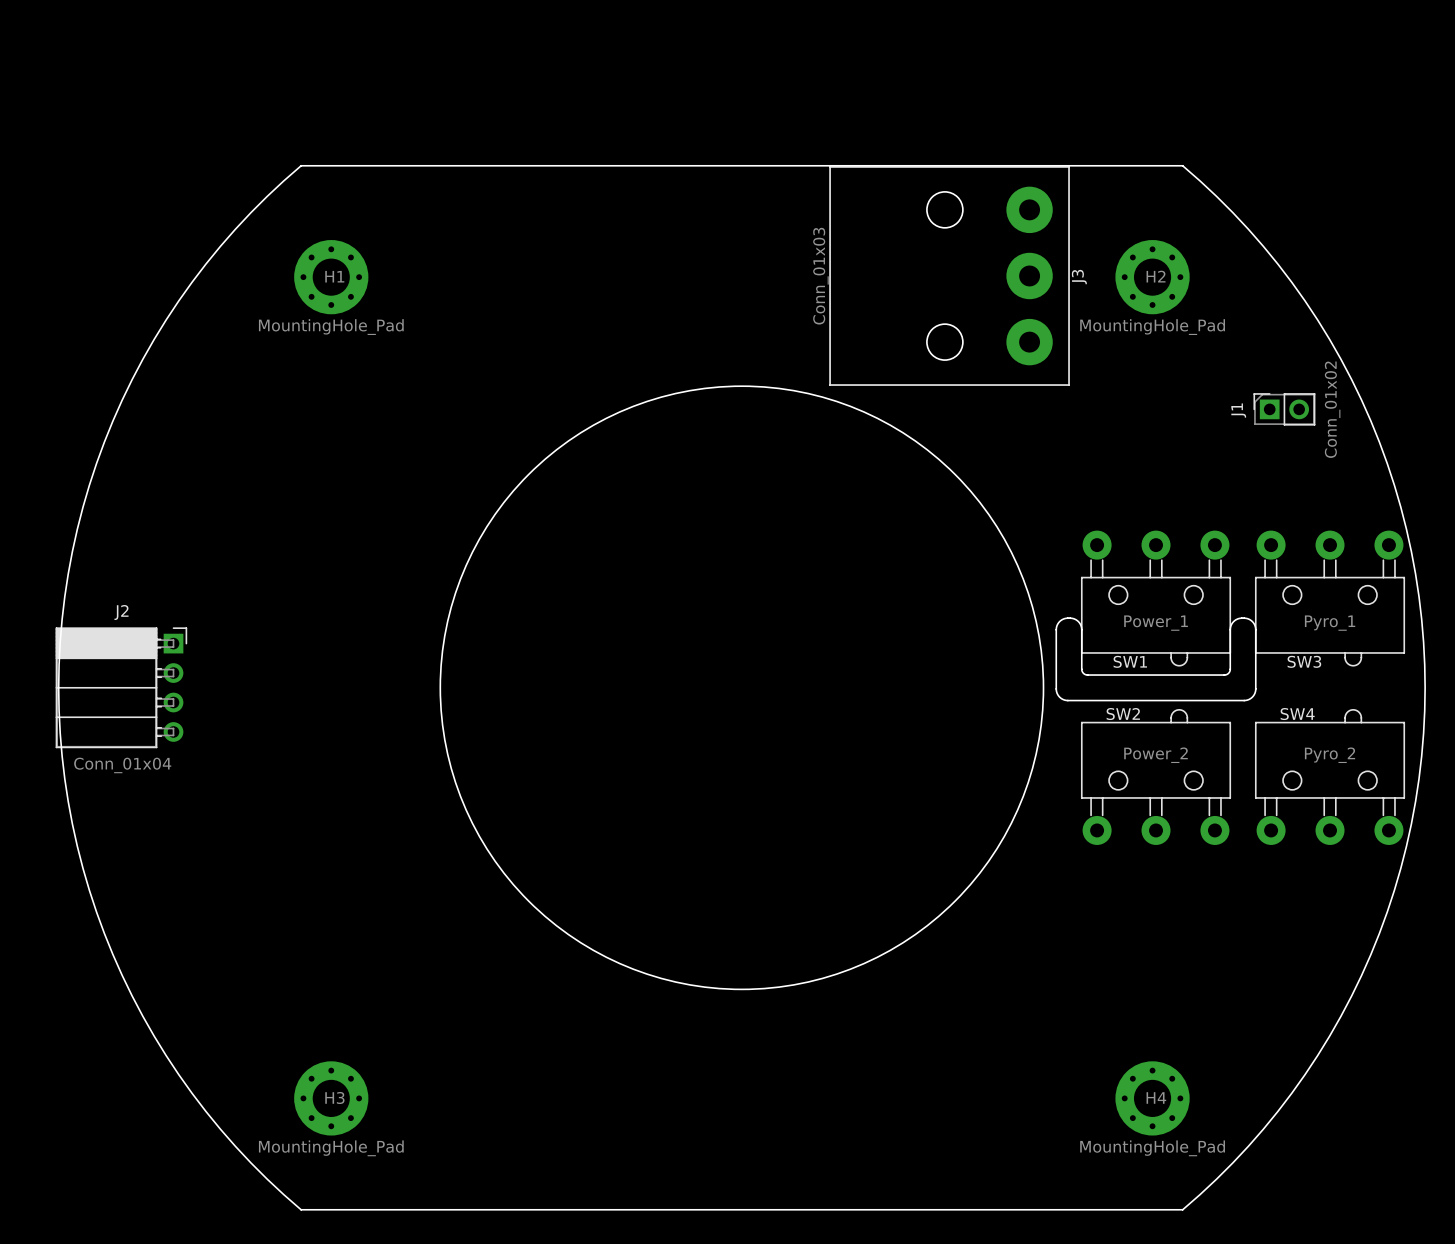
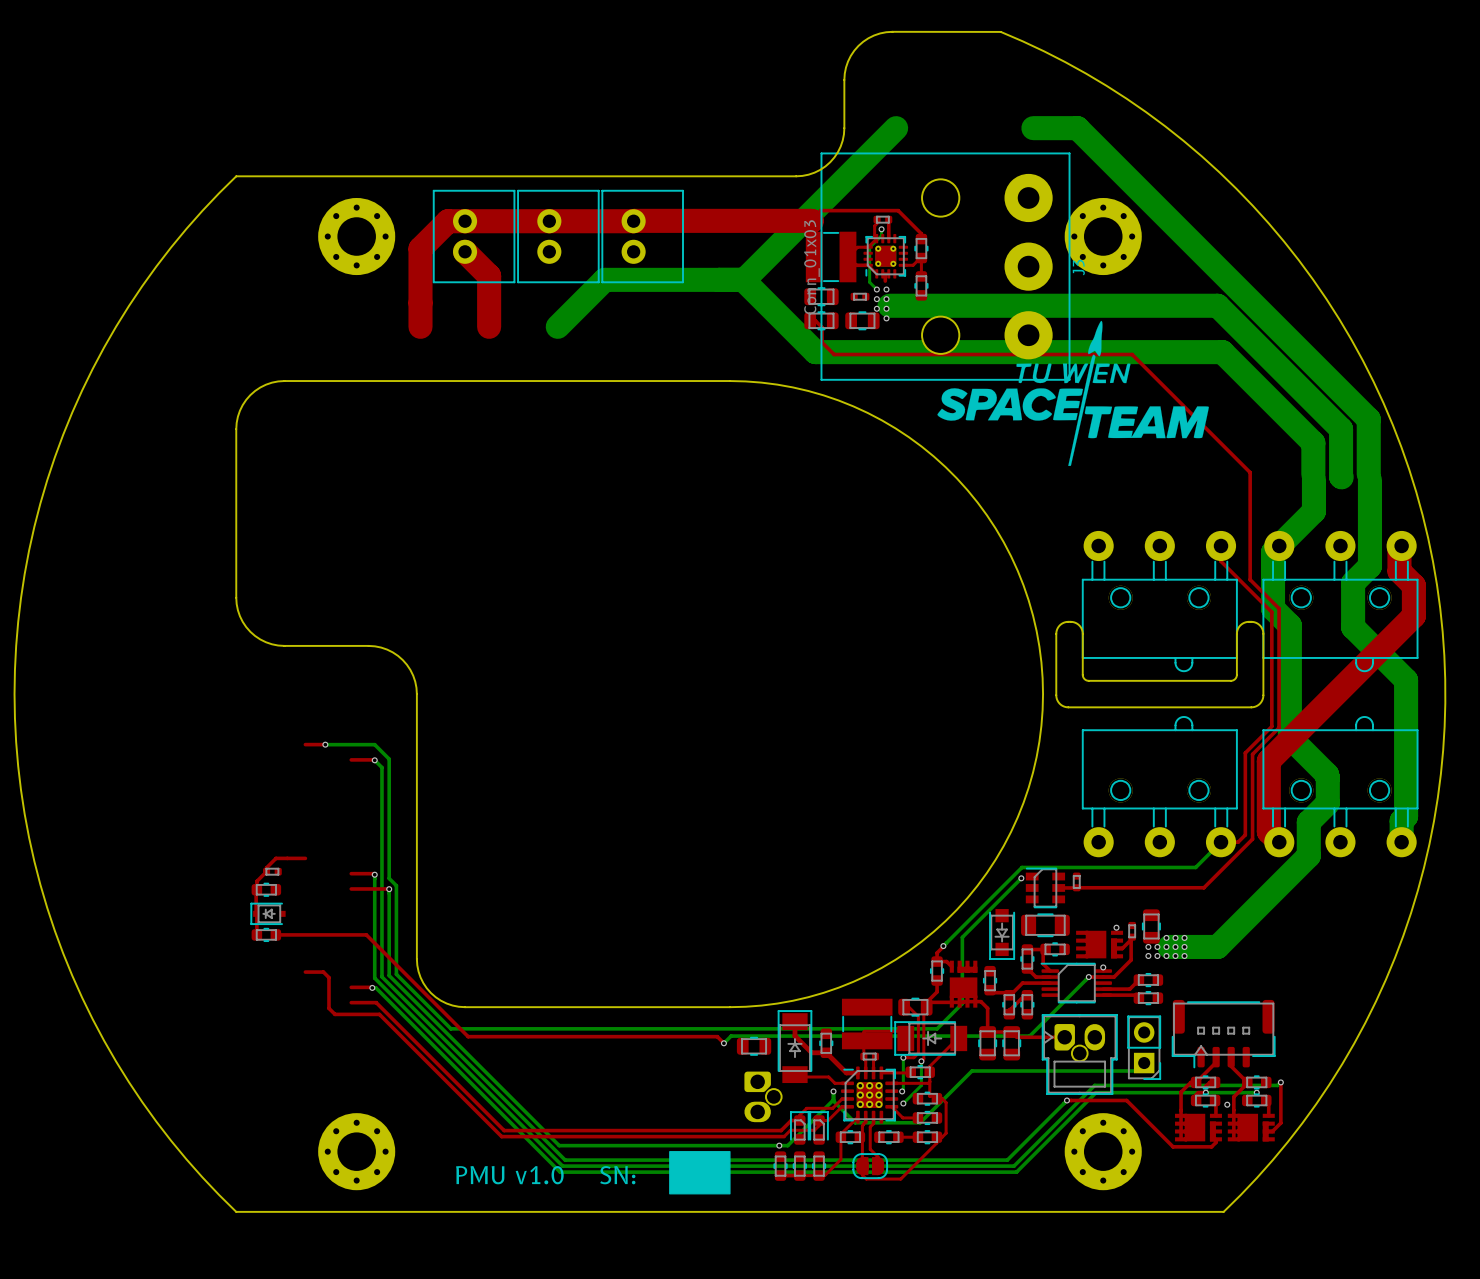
bottom track: none -> (896, 128) (744, 279) (604, 279) (557, 326)
bottom track: none -> (1033, 128) (1077, 128) (1368, 419) (1368, 474)
board edge: (301, 165) (1182, 165) (1232, 212) (1263, 246) (1305, 300) (1340, 359) (1370, 420) (1394, 485) (1406, 529) (1419, 596) (1424, 664) (1423, 733) (1415, 801) (1400, 868) (1379, 933) (1351, 996) (1317, 1055) (1277, 1111) (1232, 1163) (1182, 1209) (301, 1209) (251, 1163) (220, 1129) (178, 1074) (142, 1016) (112, 954) (89, 890) (72, 823) (62, 756) (58, 687) (60, 642) (68, 574) (83, 507) (104, 442) (132, 379) (166, 319) (205, 264) (251, 212) (301, 165) -> (892, 31) (880, 33) (868, 38) (858, 45) (850, 55) (844, 73) (844, 128) (840, 146) (834, 157) (825, 166) (808, 174) (796, 176) (236, 176) (202, 210) (171, 247) (142, 286) (104, 347) (82, 390) (54, 457) (34, 526) (24, 574) (18, 621) (14, 694) (16, 742) (24, 814) (34, 861) (54, 930) (72, 975) (104, 1040) (128, 1082) (171, 1140) (202, 1177) (236, 1211) (1223, 1211) (1272, 1160) (1302, 1123) (1329, 1084) (1354, 1043) (1376, 1001) (1394, 957) (1417, 890) (1434, 821) (1440, 774) (1444, 726) (1444, 655) (1440, 608) (1432, 561) (1422, 515) (1409, 469) (1383, 403) (1362, 360) (1339, 319) (1312, 279) (1284, 241) (1252, 205) (1219, 172) (1165, 126) (1126, 98) (1086, 73) (1044, 51) (1000, 31) (892, 31)
top track: none -> (877, 219) (874, 225) (874, 236) (876, 238) (868, 247) (857, 247) (847, 256) (856, 265) (868, 265) (876, 273)
part: none -> (882, 219)
top track: none -> (888, 219) (888, 238)
top track: none -> (811, 221) (448, 221) (420, 248) (420, 326)
bottom track: none -> (881, 229) (881, 235) (869, 247) (869, 282) (876, 289)
via: none -> (881, 229)
part: none -> (356, 236)
part: none -> (474, 236)
part: none -> (558, 236)
part: none -> (642, 236)
part: none -> (1103, 236)
top track: none -> (921, 239) (921, 233) (898, 210) (820, 210) (814, 217) (814, 256)
part: none -> (921, 248)
top track: none -> (465, 251) (489, 275) (489, 326)
part: none -> (831, 256)
part: none -> (885, 256)
top track: none -> (903, 265) (913, 265) (921, 256) (921, 277)
H1: MountingHole_Pad (331, 277) -> none
H2: MountingHole_Pad (1152, 277) -> none
top track: none -> (888, 273) (882, 273) (885, 276) (885, 281)
bottom track: none -> (743, 279) (815, 352) (1222, 352) (1313, 443) (1313, 474)
part: none -> (921, 285)
via: none -> (876, 289)
via: none -> (886, 289)
part: none -> (821, 296)
part: none -> (860, 296)
via: none -> (876, 299)
via: none -> (886, 299)
bottom track: none -> (889, 305) (1217, 305) (1341, 429) (1341, 477)
via: none -> (876, 308)
via: none -> (886, 308)
via: none -> (886, 318)
top track: none -> (810, 320) (815, 320) (822, 327) (822, 342) (834, 354) (1132, 354) (1250, 472) (1250, 579) (1279, 608) (1279, 727) (1252, 754) (1252, 839) (1203, 887) (1058, 887)
part: none -> (821, 320)
part: none -> (862, 320)
drawing: none -> [937, 320, 1209, 466]
round board edge: [440, 385, 1044, 990] -> none
board edge: none -> (284, 381) (761, 382) (792, 387) (838, 400) (881, 420) (908, 437) (933, 456) (956, 478) (977, 502) (995, 528) (1011, 556) (1023, 585) (1033, 615) (1039, 646) (1042, 678) (1042, 709) (1039, 741) (1033, 772) (1023, 802) (1011, 831) (986, 872) (956, 909) (933, 931) (908, 951) (881, 967) (853, 981) (823, 992) (792, 1000) (761, 1005) (729, 1007) (465, 1007) (452, 1005) (435, 997) (423, 983) (417, 965) (416, 694) (415, 681) (410, 670) (398, 655) (387, 649) (375, 646) (284, 645) (266, 642) (255, 635) (246, 627) (237, 610) (236, 597) (236, 429) (237, 416) (246, 399) (255, 390) (271, 382) (284, 381)
J1: Conn_01x02 (1284, 409) -> none
bottom track: none -> (1313, 479) (1313, 511) (1273, 552) (1273, 608) (1289, 625) (1289, 737) (1327, 774) (1327, 803) (1308, 822) (1308, 855) (1217, 946) (1169, 946)
bottom track: none -> (1369, 480) (1369, 566) (1353, 583) (1353, 627) (1406, 680) (1406, 816) (1401, 820) (1401, 842)
top track: none -> (1221, 545) (1221, 561) (1271, 612) (1271, 726) (1245, 753) (1245, 834) (1238, 842) (1221, 842)
top track: none -> (1401, 545) (1399, 548) (1399, 571) (1413, 585) (1413, 615) (1268, 761) (1268, 831) (1279, 842)
SW1: Power_1 (1156, 598) -> none
part: none -> (1159, 601)
SW3: Pyro_1 (1330, 598) -> none
part: none -> (1340, 601)
J2: Conn_01x04 (121, 687) -> none
top track: none -> (305, 744) (325, 744)
bottom track: none -> (325, 744) (374, 744) (389, 759) (389, 878) (396, 885) (396, 974) (450, 1028) (937, 1028) (962, 1003) (962, 937) (1021, 878)
via: none -> (325, 744)
top track: none -> (351, 759) (374, 760)
bottom track: none -> (374, 760) (381, 767) (381, 976) (565, 1160) (1007, 1160) (1066, 1100)
via: none -> (374, 760)
SW2: Power_2 (1156, 777) -> none
part: none -> (1159, 786)
SW4: Pyro_2 (1330, 777) -> none
part: none -> (1340, 786)
bottom track: none -> (1221, 842) (1195, 867) (1021, 867) (943, 946)
top track: none -> (305, 858) (276, 858) (256, 881) (256, 934)
part: none -> (272, 871)
top track: none -> (351, 873) (374, 874)
bottom track: none -> (374, 874) (374, 978) (562, 1166) (1014, 1166) (1094, 1085) (1277, 1085) (1280, 1082)
via: none -> (374, 874)
via: none -> (1021, 878)
part: none -> (1076, 881)
part: none -> (1045, 887)
top track: none -> (351, 888) (389, 889)
bottom track: none -> (389, 889) (389, 975) (559, 1145) (787, 1145) (833, 1099)
via: none -> (389, 889)
part: none -> (266, 889)
part: none -> (268, 913)
part: none -> (1045, 925)
part: none -> (1151, 926)
via: none -> (1116, 927)
part: none -> (1132, 931)
part: none -> (266, 934)
top track: none -> (275, 934) (366, 934) (468, 1036) (717, 1036) (723, 1043)
part: none -> (1002, 934)
via: none -> (1166, 937)
via: none -> (1175, 937)
via: none -> (1184, 937)
part: none -> (1099, 944)
top track: none -> (943, 946) (937, 952) (937, 961) (946, 961) (951, 966)
via: none -> (943, 946)
via: none -> (1148, 946)
via: none -> (1157, 946)
via: none -> (1166, 946)
via: none -> (1175, 946)
via: none -> (1184, 946)
top track: none -> (1114, 948) (1122, 948) (1131, 939) (1131, 960) (1114, 977) (1088, 977)
top track: none -> (1027, 949) (1043, 949)
top track: none -> (1043, 949) (1043, 963) (1050, 971)
part: none -> (1055, 949)
via: none -> (1148, 955)
via: none -> (1157, 955)
via: none -> (1166, 955)
via: none -> (1175, 955)
via: none -> (1184, 955)
part: none -> (1027, 959)
via: none -> (1103, 967)
top track: none -> (1027, 968) (1035, 977) (1050, 977)
part: none -> (937, 971)
top track: none -> (305, 972) (323, 972) (328, 977) (328, 1008) (335, 1014) (379, 1014) (501, 1136) (784, 1136) (790, 1130) (814, 1130) (819, 1125) (819, 1120)
bottom track: none -> (1088, 977) (1029, 1036) (731, 1036) (723, 1043)
via: none -> (1088, 977)
top track: none -> (937, 980) (937, 991) (926, 1002)
part: none -> (990, 980)
top track: none -> (1138, 980) (1129, 989) (1103, 989)
part: none -> (1148, 980)
top track: none -> (1050, 983) (1022, 983) (1010, 995) (1006, 992) (992, 992) (990, 990)
part: none -> (1076, 983)
part: none -> (963, 984)
top track: none -> (351, 987) (372, 987)
bottom track: none -> (372, 987) (375, 987) (560, 1172) (1016, 1172) (1096, 1092) (1256, 1092)
via: none -> (372, 987)
top track: none -> (1027, 992) (1009, 1009)
top track: none -> (1103, 995) (1135, 995) (1138, 998)
part: none -> (1148, 998)
top track: none -> (904, 1002) (918, 1016) (918, 1053) (913, 1057) (903, 1057)
top track: none -> (926, 1002) (923, 1005) (923, 1058) (921, 1061)
top track: none -> (926, 1002) (980, 1001) (987, 1008) (987, 1032) (1011, 1032) (1017, 1037) (1064, 1037)
top track: none -> (351, 1002) (376, 1002) (504, 1130) (781, 1130) (791, 1120) (799, 1120) (799, 1115) (806, 1108) (832, 1108) (842, 1098) (847, 1098)
part: none -> (1009, 1004)
part: none -> (1027, 1004)
part: none -> (915, 1007)
top track: none -> (794, 1021) (794, 1036) (811, 1052) (826, 1052) (846, 1072) (857, 1072)
part: none -> (867, 1024)
part: none -> (1223, 1034)
top track: none -> (910, 1038) (903, 1031) (864, 1031) (863, 1055)
part: none -> (930, 1038)
top track: none -> (957, 1038) (929, 1066) (929, 1081)
via: none -> (723, 1043)
part: none -> (826, 1043)
part: none -> (987, 1043)
part: none -> (1011, 1043)
part: none -> (754, 1046)
part: none -> (794, 1046)
part: none -> (1144, 1047)
part: none -> (1079, 1054)
part: none -> (869, 1056)
top track: none -> (1216, 1057) (1216, 1062) (1196, 1082) (1190, 1082) (1181, 1092) (1181, 1139)
top track: none -> (1231, 1057) (1231, 1066) (1247, 1082) (1233, 1096) (1233, 1139)
bottom track: none -> (903, 1057) (902, 1091)
via: none -> (903, 1057)
top track: none -> (863, 1058) (865, 1060) (865, 1072)
top track: none -> (875, 1058) (873, 1060) (873, 1072)
bottom track: none -> (921, 1061) (921, 1085) (903, 1103)
via: none -> (921, 1061)
bottom track: none -> (1139, 1064) (1136, 1070) (971, 1070) (920, 1122) (855, 1122) (833, 1101) (833, 1091)
top track: none -> (910, 1072) (881, 1072)
part: none -> (920, 1072)
top track: none -> (799, 1077) (828, 1077) (835, 1083) (847, 1083)
top track: none -> (929, 1081) (891, 1083)
top track: none -> (929, 1081) (929, 1096) (934, 1096) (938, 1100)
part: none -> (1205, 1082)
top track: none -> (1215, 1082) (1209, 1082) (1205, 1086) (1205, 1092) (1198, 1092) (1196, 1100)
part: none -> (1256, 1082)
top track: none -> (1280, 1082) (1280, 1123) (1272, 1131) (1265, 1131)
via: none -> (1280, 1082)
via: none -> (833, 1091)
via: none -> (902, 1091)
via: none -> (1205, 1092)
via: none -> (1256, 1092)
part: none -> (869, 1095)
part: none -> (763, 1096)
part: none -> (927, 1098)
top track: none -> (936, 1098) (942, 1098) (946, 1102) (946, 1133) (942, 1137) (936, 1137) (936, 1142) (900, 1179) (866, 1179) (862, 1175) (862, 1139) (859, 1137) (862, 1134) (862, 1125) (865, 1121) (865, 1117)
top track: none -> (1066, 1100) (1126, 1100) (1173, 1146) (1211, 1146) (1215, 1142) (1215, 1139)
via: none -> (1066, 1100)
part: none -> (1205, 1100)
top track: none -> (1215, 1100) (1215, 1115)
part: none -> (1256, 1100)
top track: none -> (1266, 1100) (1268, 1102) (1268, 1115)
via: none -> (903, 1103)
via: none -> (1227, 1104)
top track: none -> (847, 1106) (841, 1106) (828, 1120) (818, 1120)
top track: none -> (891, 1106) (902, 1117) (917, 1117)
top track: none -> (857, 1117) (840, 1134) (840, 1159) (824, 1175) (781, 1175)
top track: none -> (873, 1117) (873, 1123) (870, 1126) (870, 1149) (878, 1157) (878, 1166)
part: none -> (927, 1117)
H3: MountingHole_Pad (331, 1098) -> none
H4: MountingHole_Pad (1152, 1098) -> none
part: none -> (799, 1128)
part: none -> (819, 1128)
part: none -> (1198, 1127)
part: none -> (1251, 1127)
part: none -> (850, 1137)
part: none -> (888, 1137)
top track: none -> (898, 1137) (917, 1137)
part: none -> (927, 1137)
via: none -> (779, 1145)
part: none -> (356, 1151)
drawing: none -> [669, 1151, 731, 1195]
part: none -> (1103, 1151)
part: none -> (780, 1166)
part: none -> (799, 1166)
part: none -> (819, 1166)
part: none -> (870, 1166)
text: none -> PMU v1.0 SN: (545, 1175)

